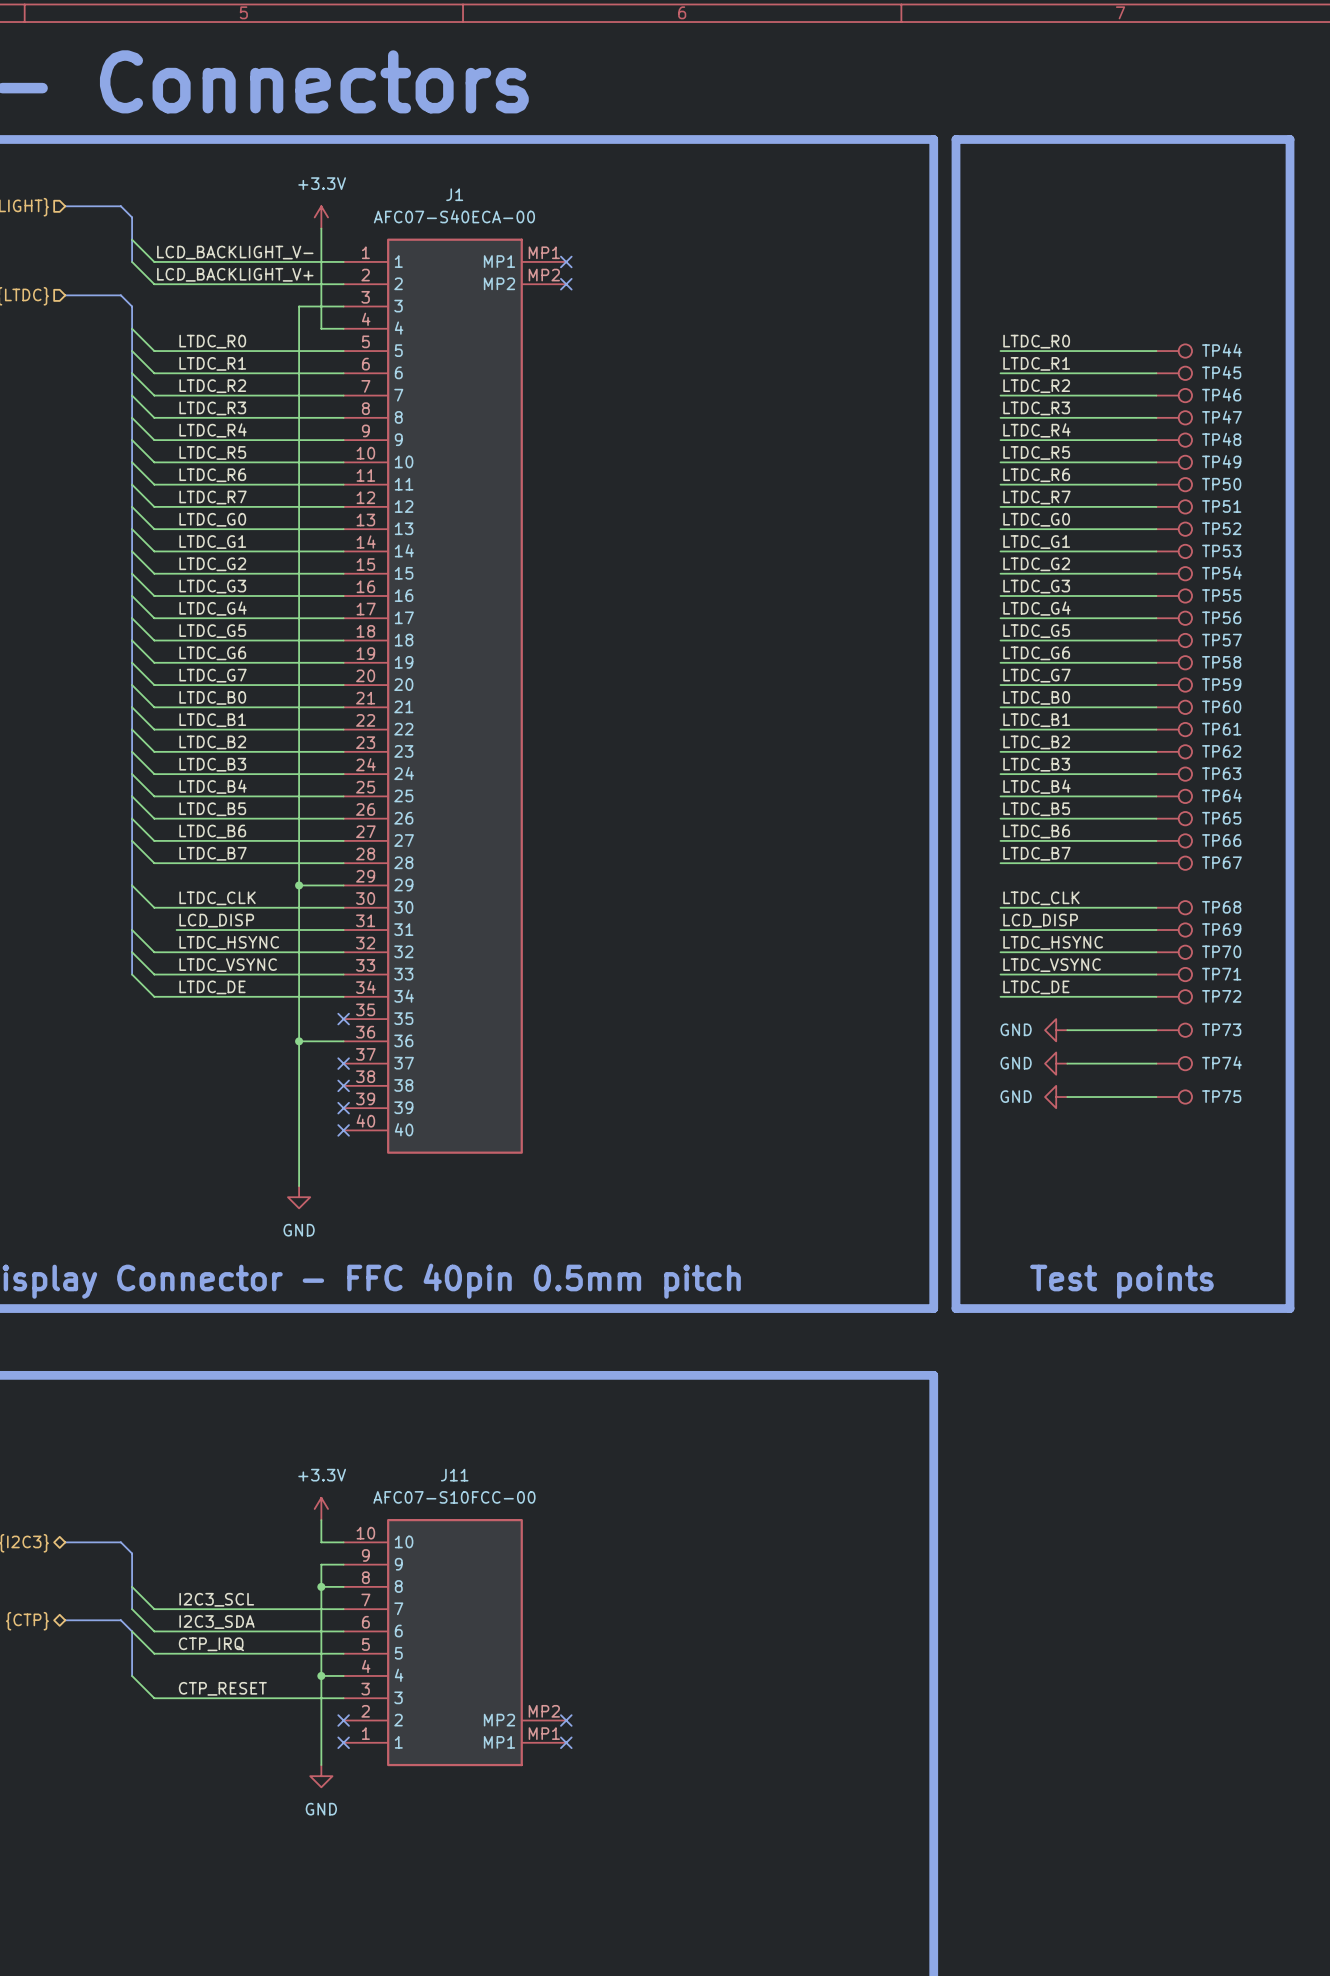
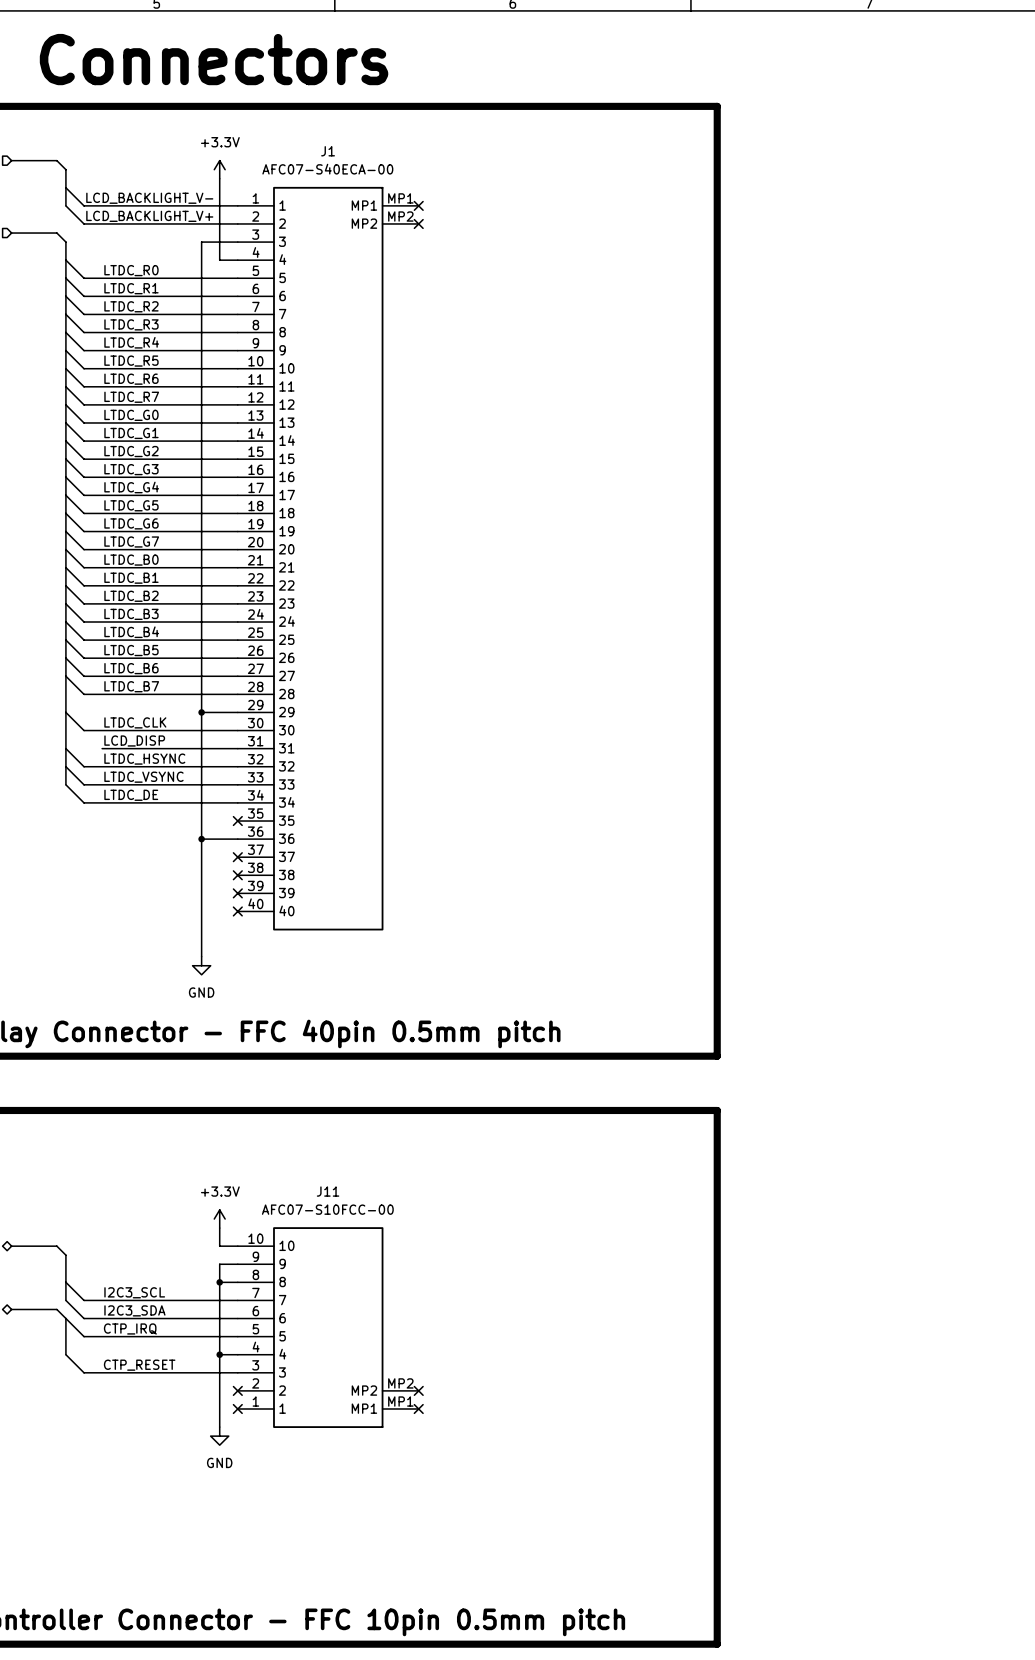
line: (955, 139) (1290, 139) (1290, 1308) (955, 1308) (955, 139) -> none
label: LTDC_R0 (1036, 341) -> none
wire: (1000, 351) (1156, 351) -> none
TP44: (1174, 351) -> none
label: LTDC_R1 (1036, 363) -> none
wire: (1000, 373) (1156, 373) -> none
TP45: (1174, 373) -> none
label: LTDC_R2 (1036, 386) -> none
wire: (1000, 395) (1156, 395) -> none
TP46: (1174, 395) -> none
label: LTDC_R3 (1036, 408) -> none
wire: (1000, 417) (1156, 417) -> none
TP47: (1174, 417) -> none
label: LTDC_R4 (1036, 430) -> none
wire: (1000, 440) (1156, 440) -> none
TP48: (1174, 440) -> none
label: LTDC_R5 (1036, 452) -> none
wire: (1000, 462) (1156, 462) -> none
TP49: (1174, 462) -> none
label: LTDC_R6 (1036, 475) -> none
wire: (1000, 484) (1156, 484) -> none
TP50: (1174, 484) -> none
label: LTDC_R7 (1036, 497) -> none
wire: (1000, 506) (1156, 506) -> none
TP51: (1174, 506) -> none
label: LTDC_G0 (1036, 519) -> none
wire: (1000, 529) (1156, 529) -> none
TP52: (1174, 529) -> none
label: LTDC_G1 (1036, 542) -> none
wire: (1000, 551) (1156, 551) -> none
TP53: (1174, 551) -> none
label: LTDC_G2 (1036, 564) -> none
wire: (1000, 573) (1156, 573) -> none
TP54: (1174, 573) -> none
label: LTDC_G3 (1036, 586) -> none
wire: (1000, 595) (1156, 595) -> none
TP55: (1174, 595) -> none
label: LTDC_G4 (1036, 608) -> none
wire: (1000, 618) (1156, 618) -> none
TP56: (1174, 618) -> none
label: LTDC_G5 (1036, 631) -> none
wire: (1000, 640) (1156, 640) -> none
TP57: (1174, 640) -> none
label: LTDC_G6 (1036, 653) -> none
wire: (1000, 662) (1156, 662) -> none
TP58: (1174, 662) -> none
label: LTDC_G7 (1036, 675) -> none
wire: (1000, 685) (1156, 685) -> none
TP59: (1174, 685) -> none
label: LTDC_B0 (1036, 697) -> none
wire: (1000, 707) (1156, 707) -> none
TP60: (1174, 707) -> none
label: LTDC_B1 (1036, 720) -> none
wire: (1000, 729) (1156, 729) -> none
TP61: (1174, 729) -> none
label: LTDC_B2 (1036, 742) -> none
wire: (1000, 751) (1156, 751) -> none
TP62: (1174, 751) -> none
label: LTDC_B3 (1036, 764) -> none
wire: (1000, 774) (1156, 774) -> none
TP63: (1174, 774) -> none
label: LTDC_B4 (1036, 786) -> none
wire: (1000, 796) (1156, 796) -> none
TP64: (1174, 796) -> none
label: LTDC_B5 (1036, 809) -> none
wire: (1000, 818) (1156, 818) -> none
TP65: (1174, 818) -> none
label: LTDC_B6 (1036, 831) -> none
wire: (1000, 840) (1156, 840) -> none
TP66: (1174, 840) -> none
label: LTDC_B7 (1036, 853) -> none
wire: (1000, 863) (1156, 863) -> none
TP67: (1174, 863) -> none
label: LTDC_CLK (1041, 898) -> none
wire: (1000, 907) (1156, 907) -> none
TP68: (1174, 907) -> none
label: LCD_DISP (1040, 920) -> none
wire: (1000, 930) (1156, 930) -> none
TP69: (1174, 930) -> none
label: LTDC_HSYNC (1053, 942) -> none
wire: (1000, 952) (1156, 952) -> none
TP70: (1174, 952) -> none
label: LTDC_VSYNC (1052, 965) -> none
wire: (1000, 974) (1156, 974) -> none
TP71: (1174, 974) -> none
label: LTDC_DE (1036, 987) -> none
wire: (1000, 996) (1156, 996) -> none
TP72: (1174, 996) -> none
power symbol: GND (1056, 1030) -> none
wire: (1067, 1030) (1156, 1030) -> none
TP73: (1174, 1030) -> none
power symbol: GND (1056, 1063) -> none
wire: (1067, 1063) (1156, 1063) -> none
TP74: (1174, 1063) -> none
power symbol: GND (1056, 1097) -> none
wire: (1067, 1097) (1156, 1097) -> none
TP75: (1174, 1097) -> none
text: Test points (1121, 1281) -> none

